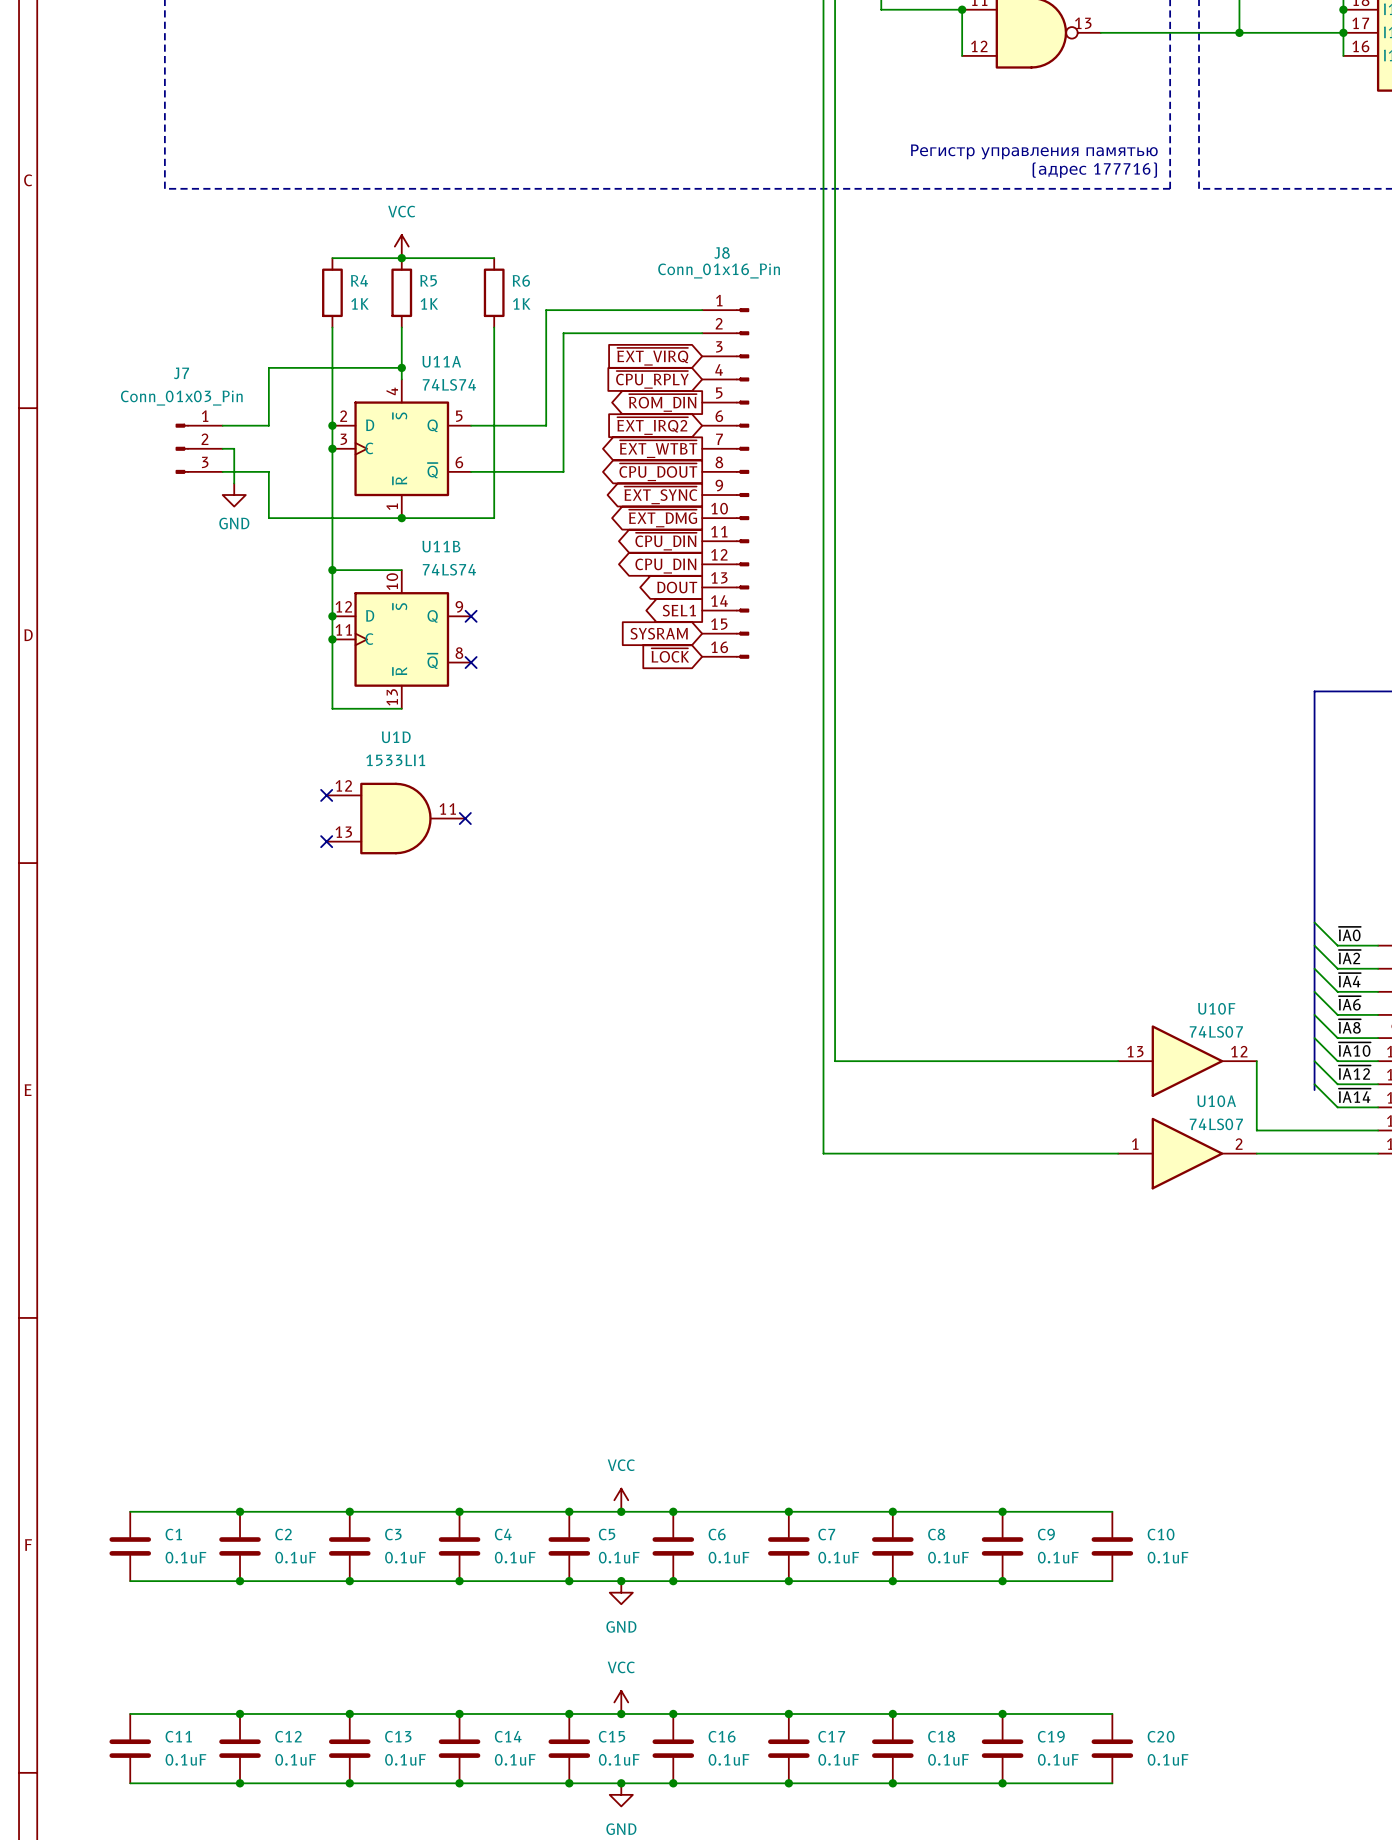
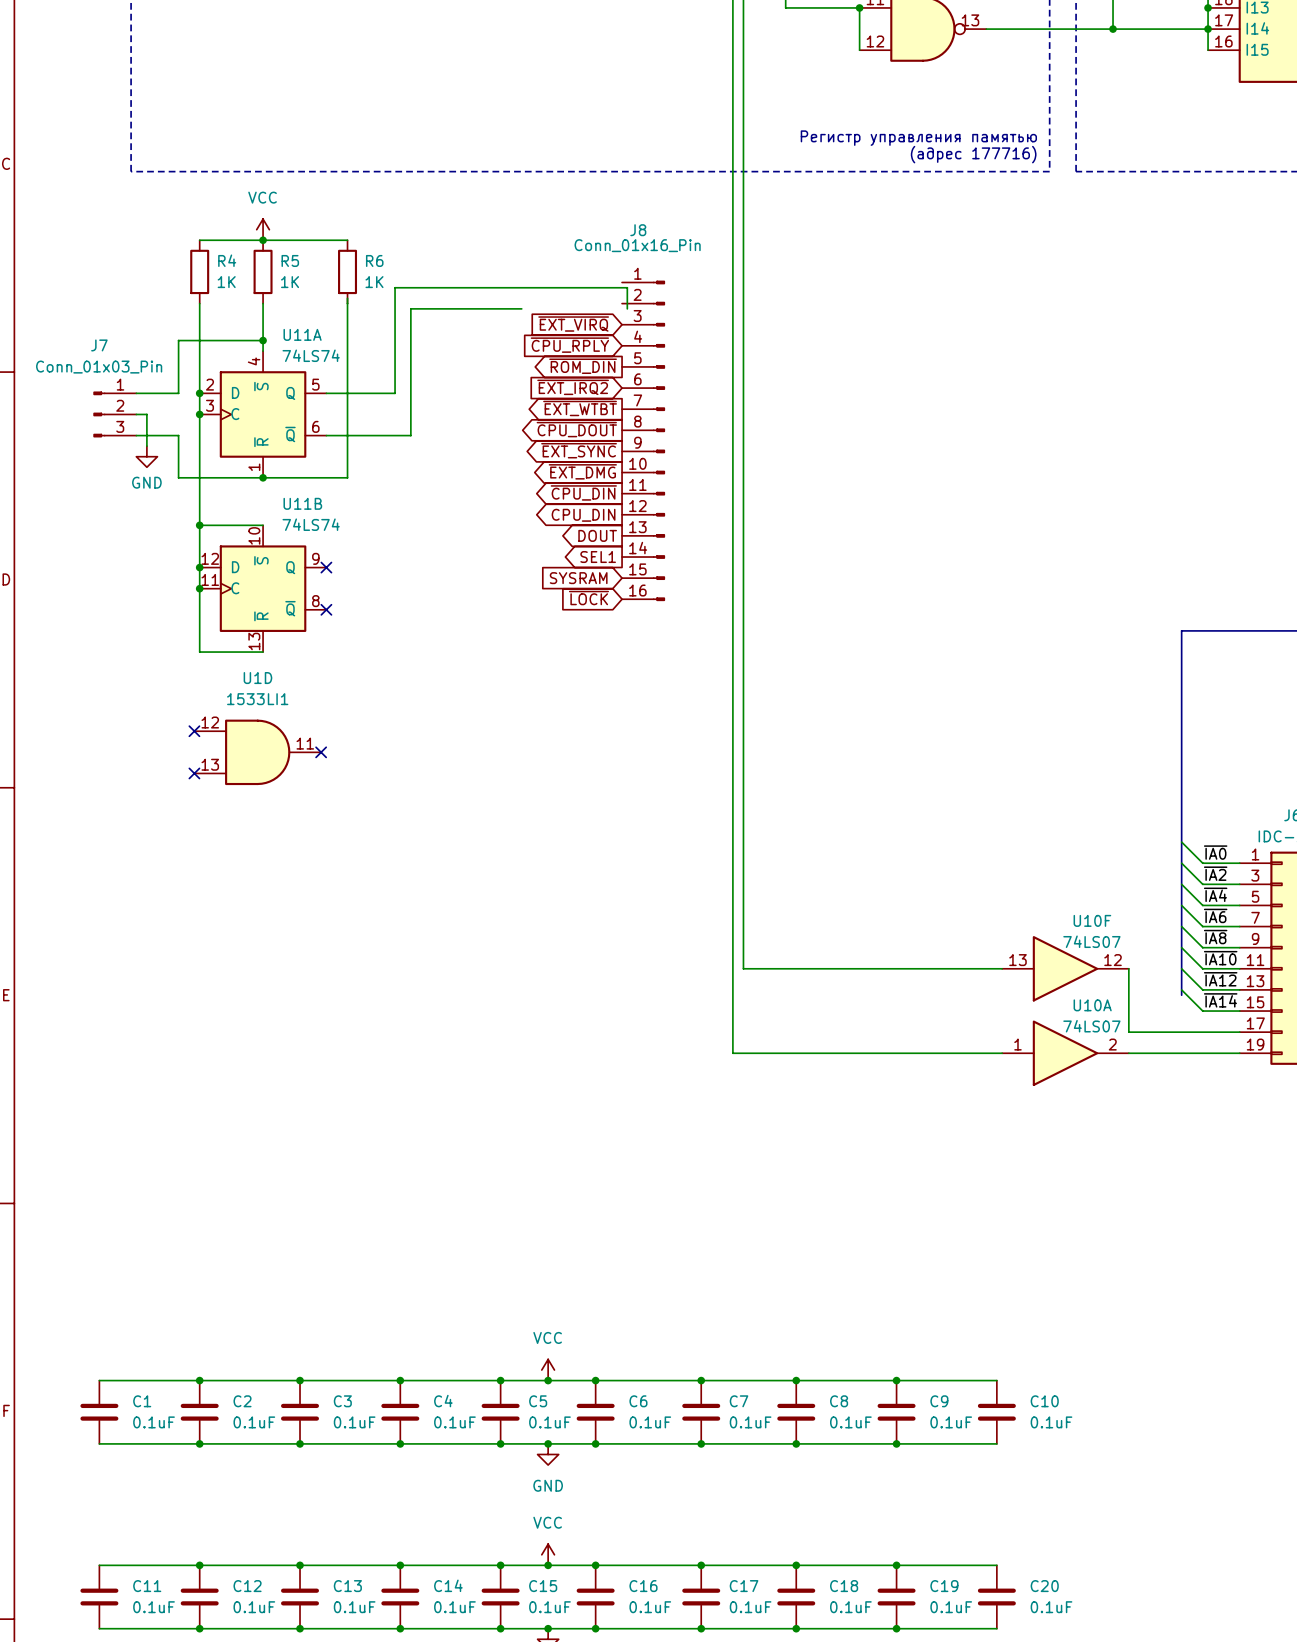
power symbol position: VCC (401, 246) -> VCC (263, 229)
wire: (332, 258) (494, 258) -> (199, 240) (347, 240)
junction: (401, 258) -> none
junction: none -> (263, 240)
R4 position: (332, 292) -> (199, 271)
R5 position: (401, 292) -> (263, 271)
R6 position: (494, 292) -> (347, 271)
wire: (702, 310) (546, 310) (546, 425) (471, 425) -> none
wire: (332, 327) (332, 708) (401, 708) -> (199, 303) (199, 652) (263, 652)
wire: (494, 327) (494, 518) (268, 518) (268, 471) (222, 471) -> none
wire: none -> (263, 303) (263, 351)
wire: (702, 333) (563, 333) (563, 471) (471, 471) -> none
wire: none -> (521, 308) (410, 308) (410, 435) (326, 435)
wire: none -> (627, 308) (627, 287) (395, 287) (395, 393) (326, 393)
wire: (401, 367) (268, 367) (268, 425) (222, 425) -> none
junction: (401, 367) -> none
wire: none -> (263, 340) (178, 340) (178, 393) (136, 393)
junction: none -> (263, 340)
wire: none -> (347, 345) (347, 477) (178, 477) (178, 435) (136, 435)
junction: (332, 425) -> none
junction: none -> (199, 393)
J7 position: (199, 448) -> (114, 414)
wire: (222, 448) (234, 448) (234, 483) -> (136, 414) (146, 414) (146, 446)
junction: (332, 448) -> none
U11A position: (401, 448) -> (263, 414)
junction: none -> (199, 414)
power symbol position: GND (234, 495) -> GND (146, 456)
junction: (401, 518) -> none
junction: none -> (263, 477)
wire: (332, 570) (401, 570) -> (199, 525) (263, 525)
junction: (332, 570) -> none
junction: none -> (199, 525)
junction: (332, 616) -> none
no-connect mark: (471, 616) -> none
junction: none -> (199, 567)
no-connect mark: none -> (326, 567)
junction: (332, 639) -> none
U11B position: (401, 639) -> (263, 588)
junction: none -> (199, 588)
no-connect mark: (471, 662) -> none
no-connect mark: none -> (326, 609)
no-connect mark: (326, 795) -> none
no-connect mark: none -> (194, 731)
U1D position: (395, 818) -> (257, 752)
no-connect mark: (465, 818) -> none
no-connect mark: none -> (321, 752)
no-connect mark: (326, 841) -> none
no-connect mark: none -> (194, 773)

